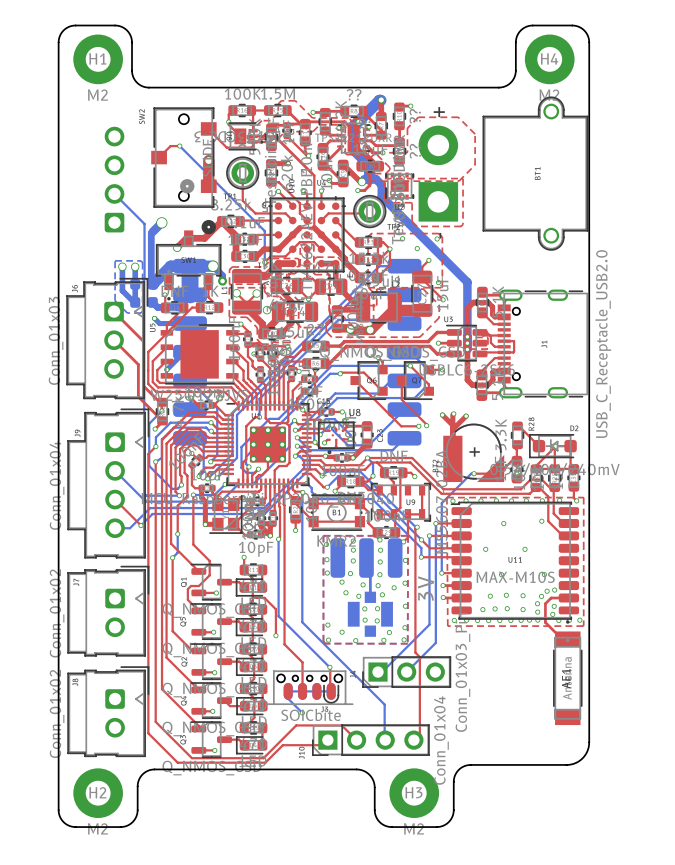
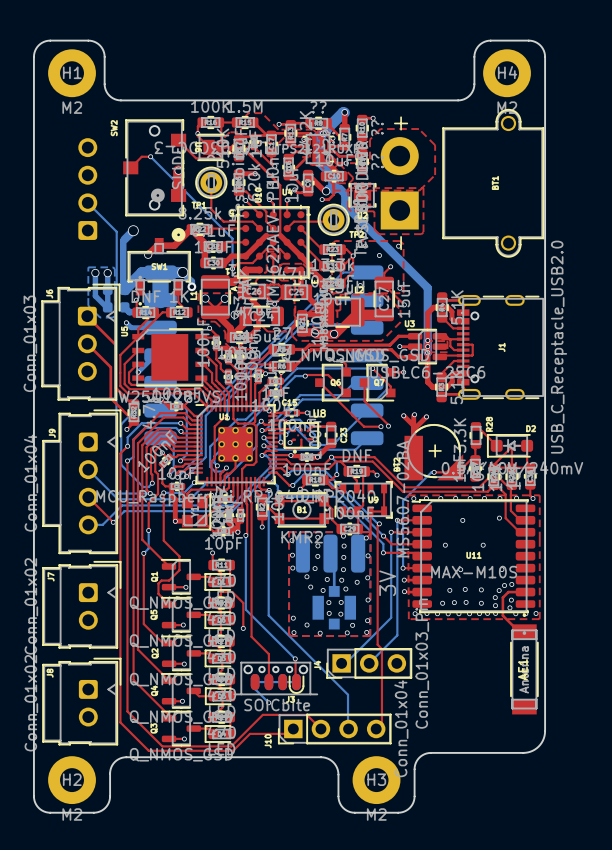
top zone outline: (272, 258) (298, 259) (298, 269) (294, 273) (286, 273) (286, 289) (298, 300) (298, 333) (289, 342) (275, 342) (271, 339) (271, 327) (284, 315) (284, 301) (279, 296) (269, 296) (264, 291) (264, 284) (229, 284) (229, 269) (232, 266) (263, 266) (272, 258) -> none

